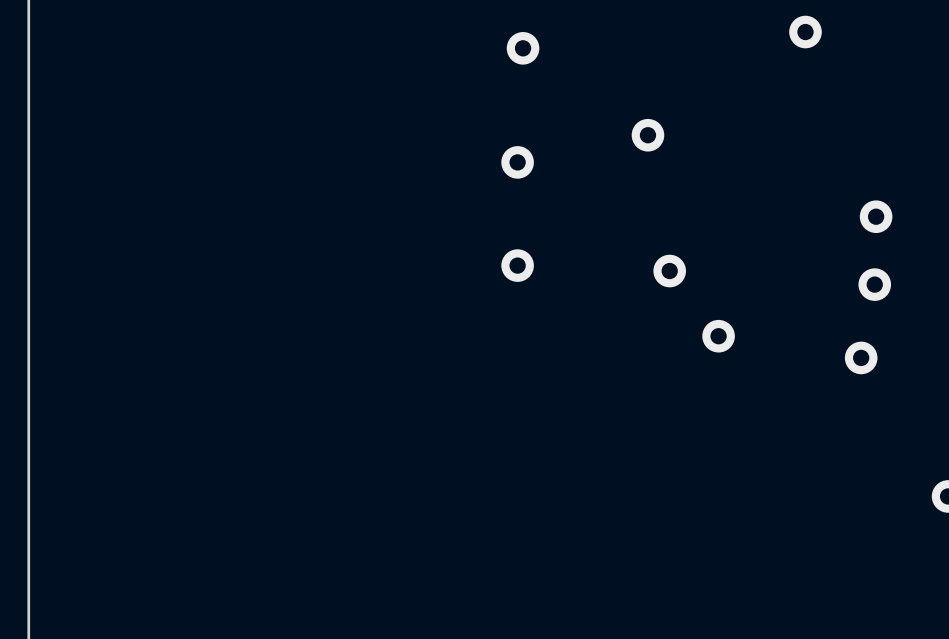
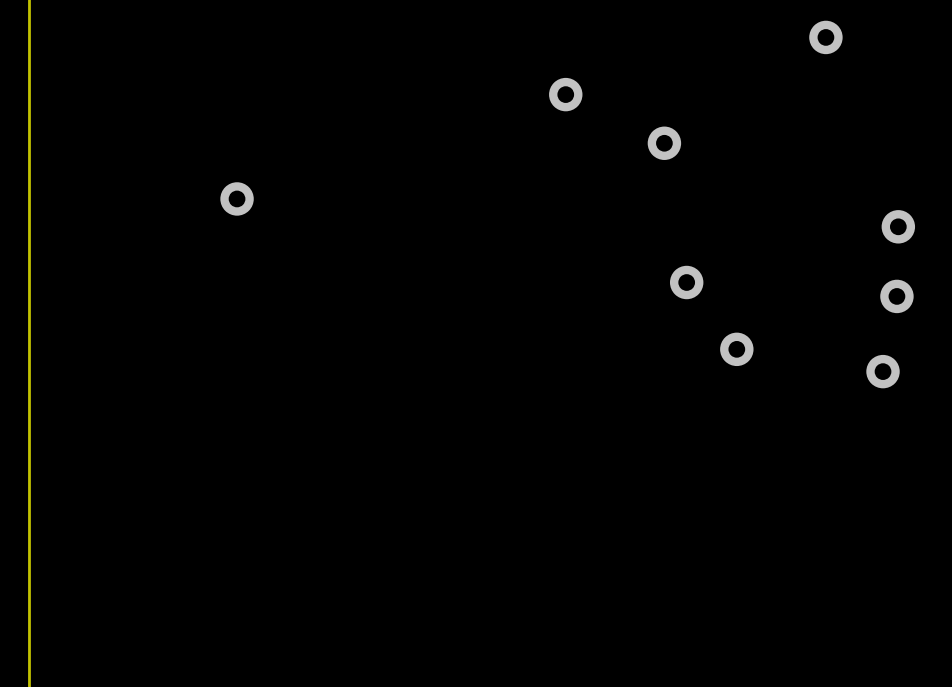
via: (523, 48) -> none
via: none -> (565, 94)
via: (517, 162) -> none
via: none -> (237, 198)
via: (517, 265) -> none

